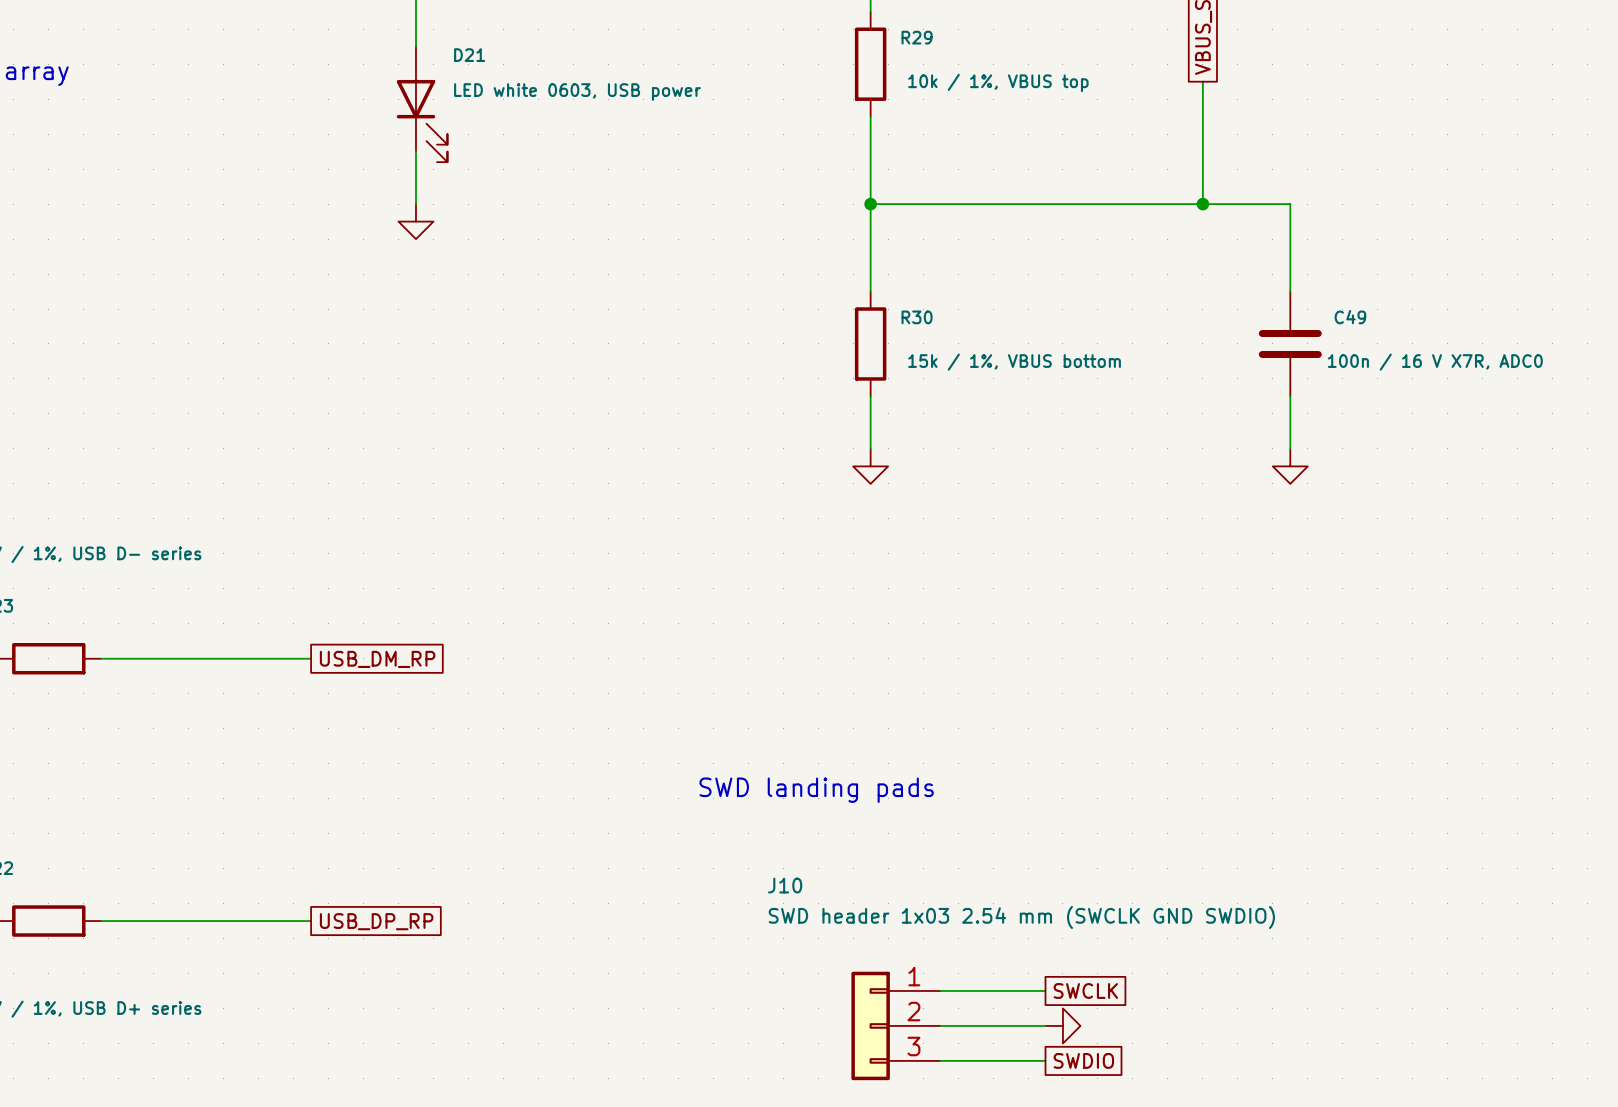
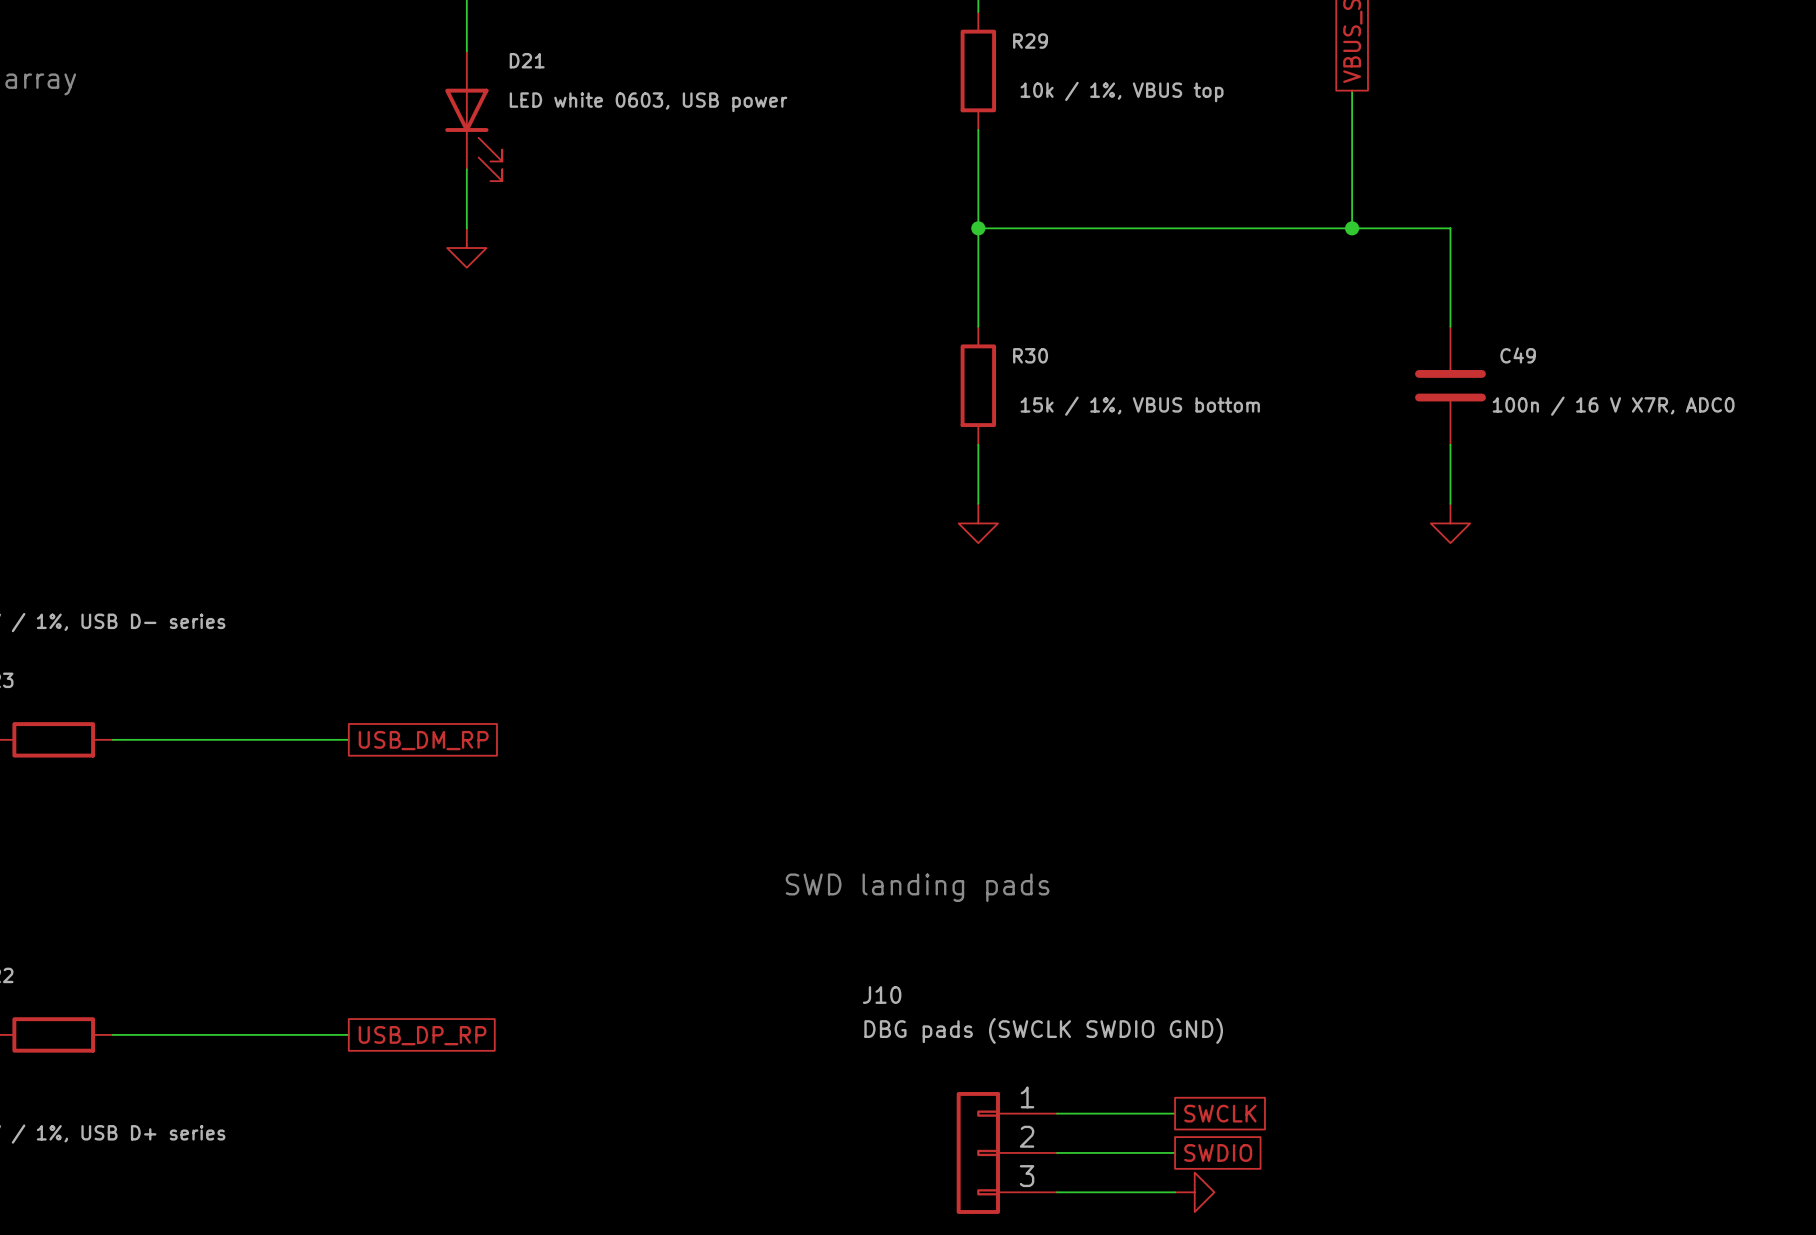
J10 value: SWD header 1x03 2.54 mm (SWCLK GND SWDIO) (1021, 917) -> DBG pads (SWCLK SWDIO GND) (1043, 1030)
power symbol position: (1062, 1025) -> (1194, 1192)
global label position: SWDIO (1083, 1060) -> SWDIO (1218, 1152)

